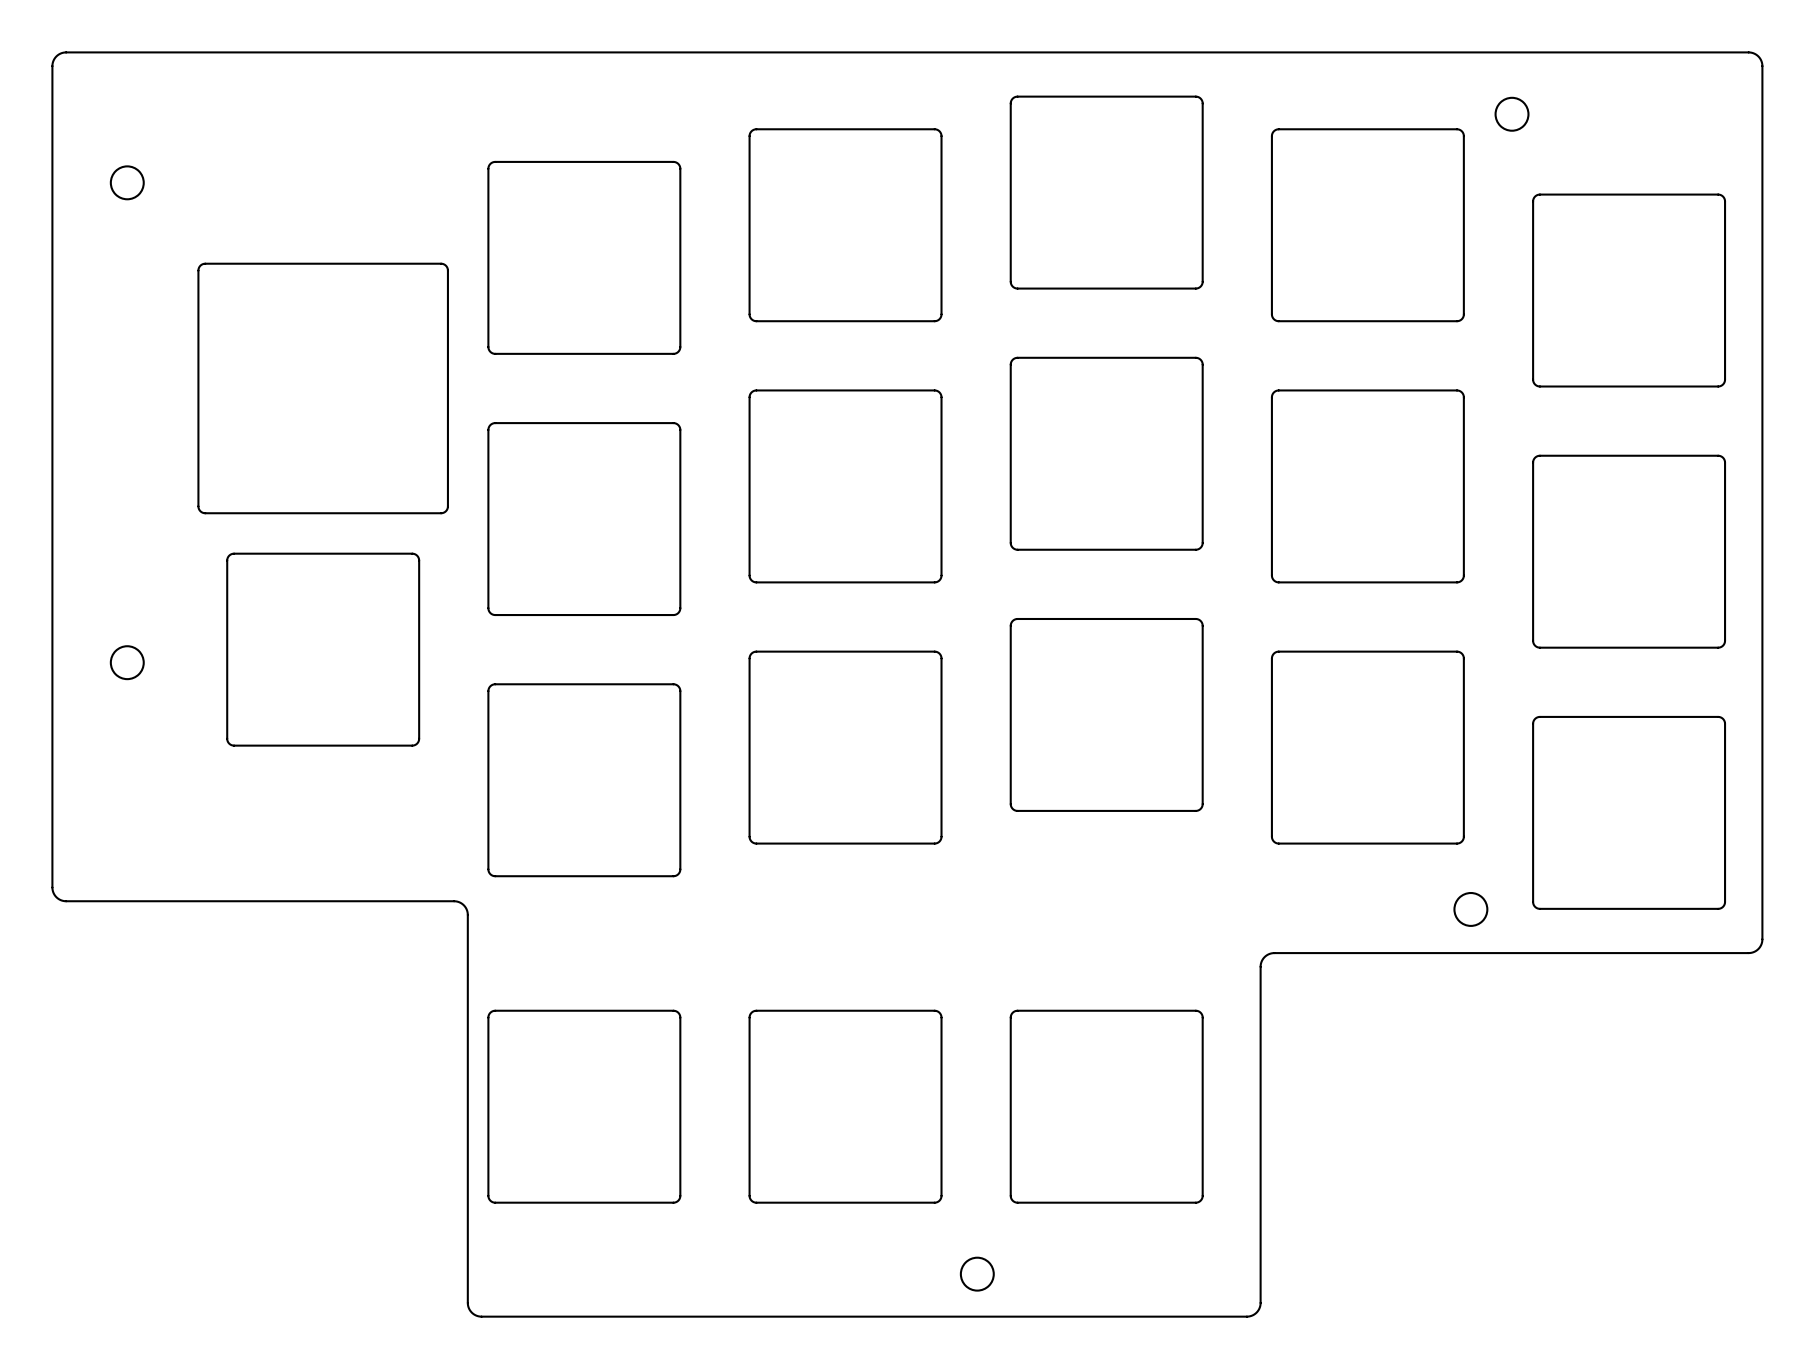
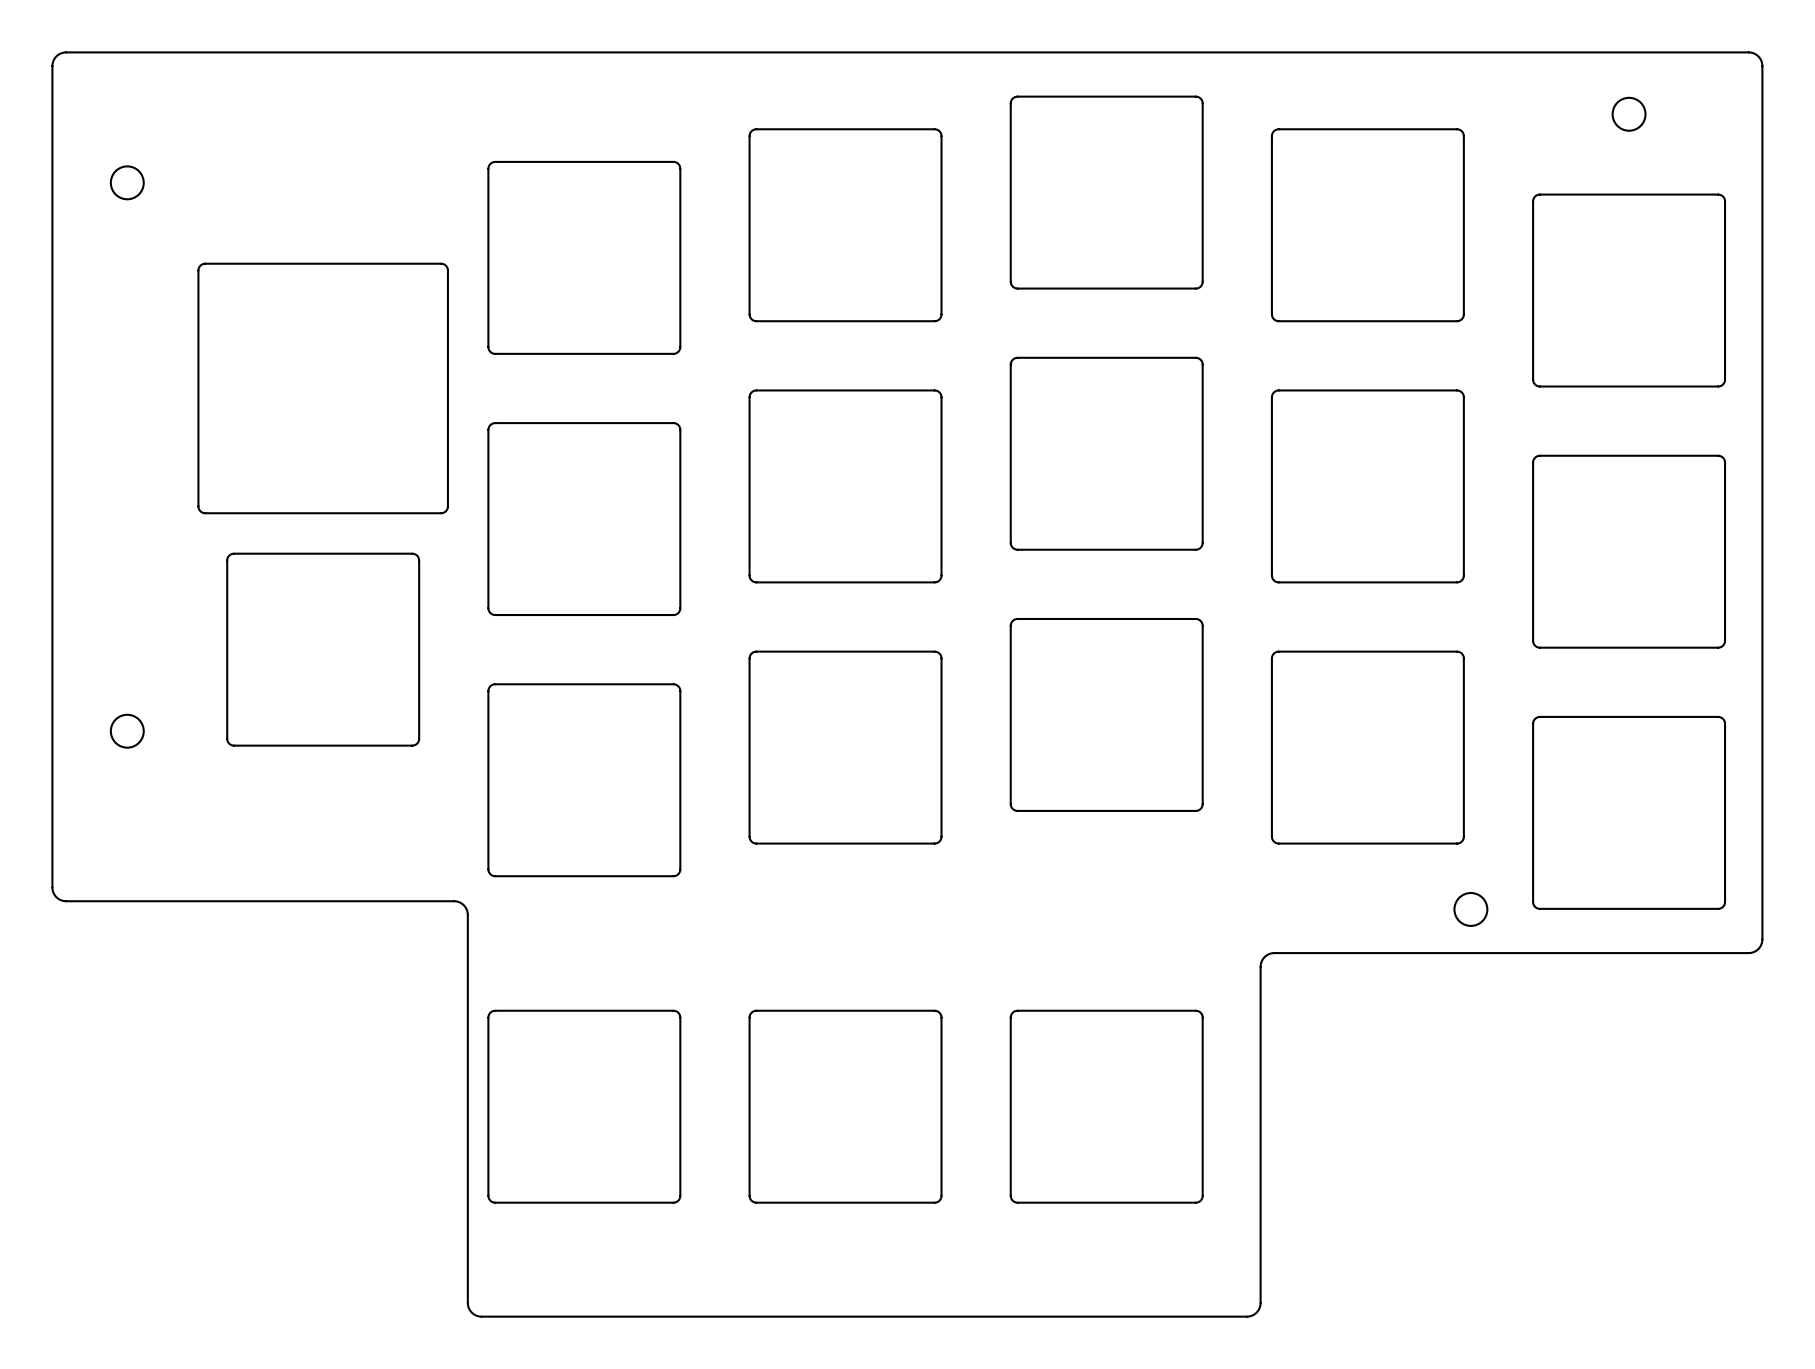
round board edge position: (1512, 114) -> (1629, 114)
round board edge position: (127, 662) -> (127, 731)
round board edge: [959, 1256, 995, 1292] -> none

